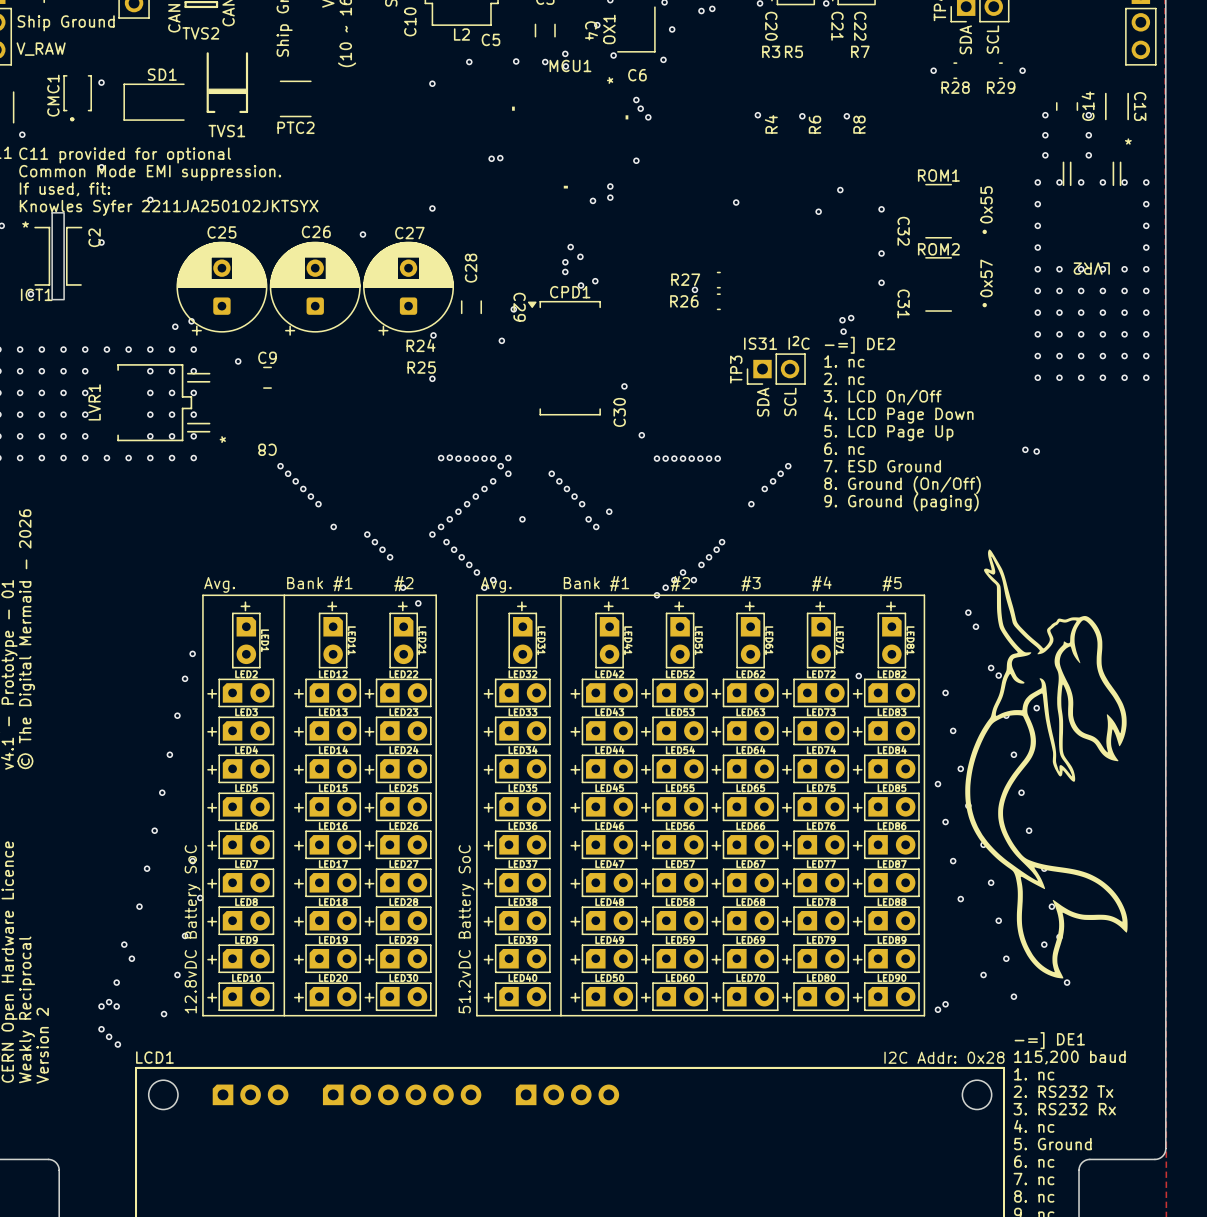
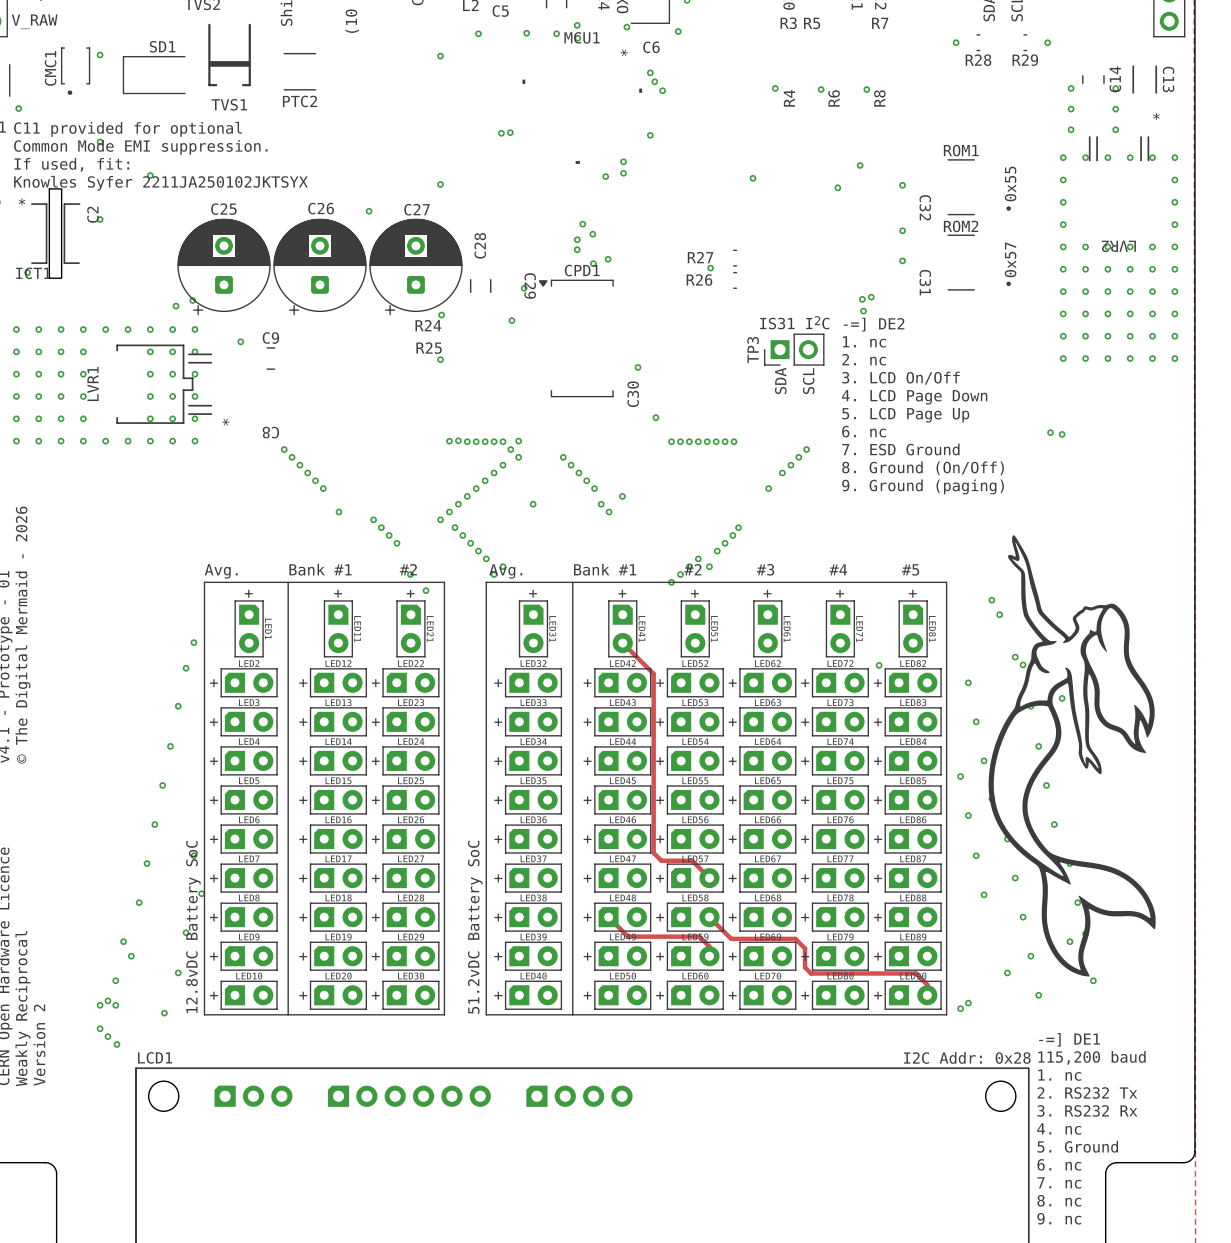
track: none -> (622, 643) (653, 673) (653, 852) (661, 860) (692, 860) (709, 878)
track: none -> (608, 917) (628, 936) (699, 936) (709, 946) (709, 956)
track: none -> (709, 917) (731, 938) (795, 938) (805, 948) (805, 967) (811, 973) (915, 973) (927, 984) (927, 995)

